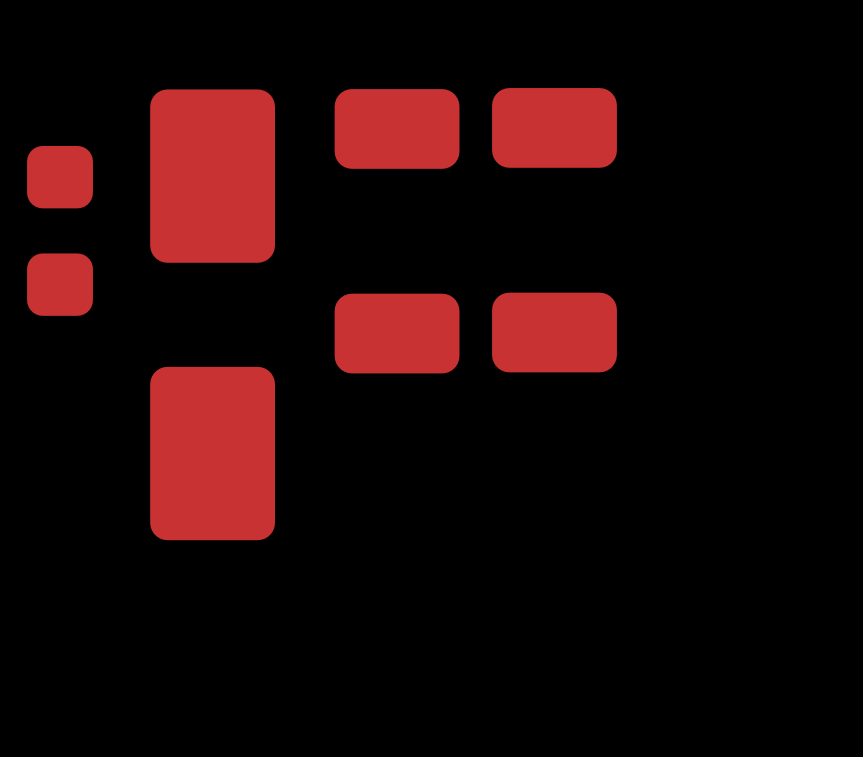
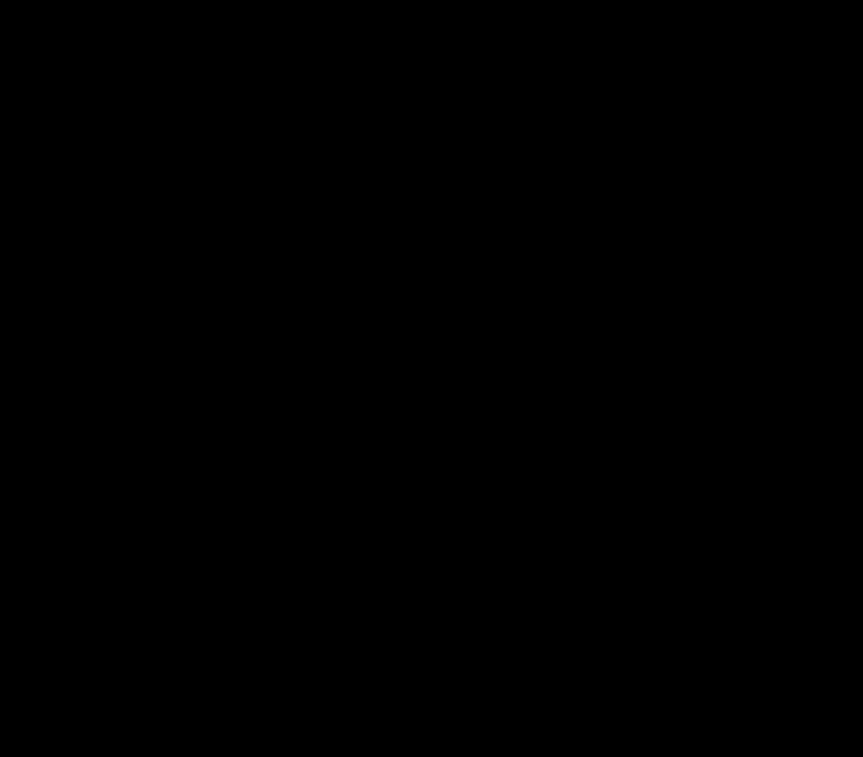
part: (60, 230) -> none
part: (554, 230) -> none
part: (397, 231) -> none
part: (212, 314) -> none

